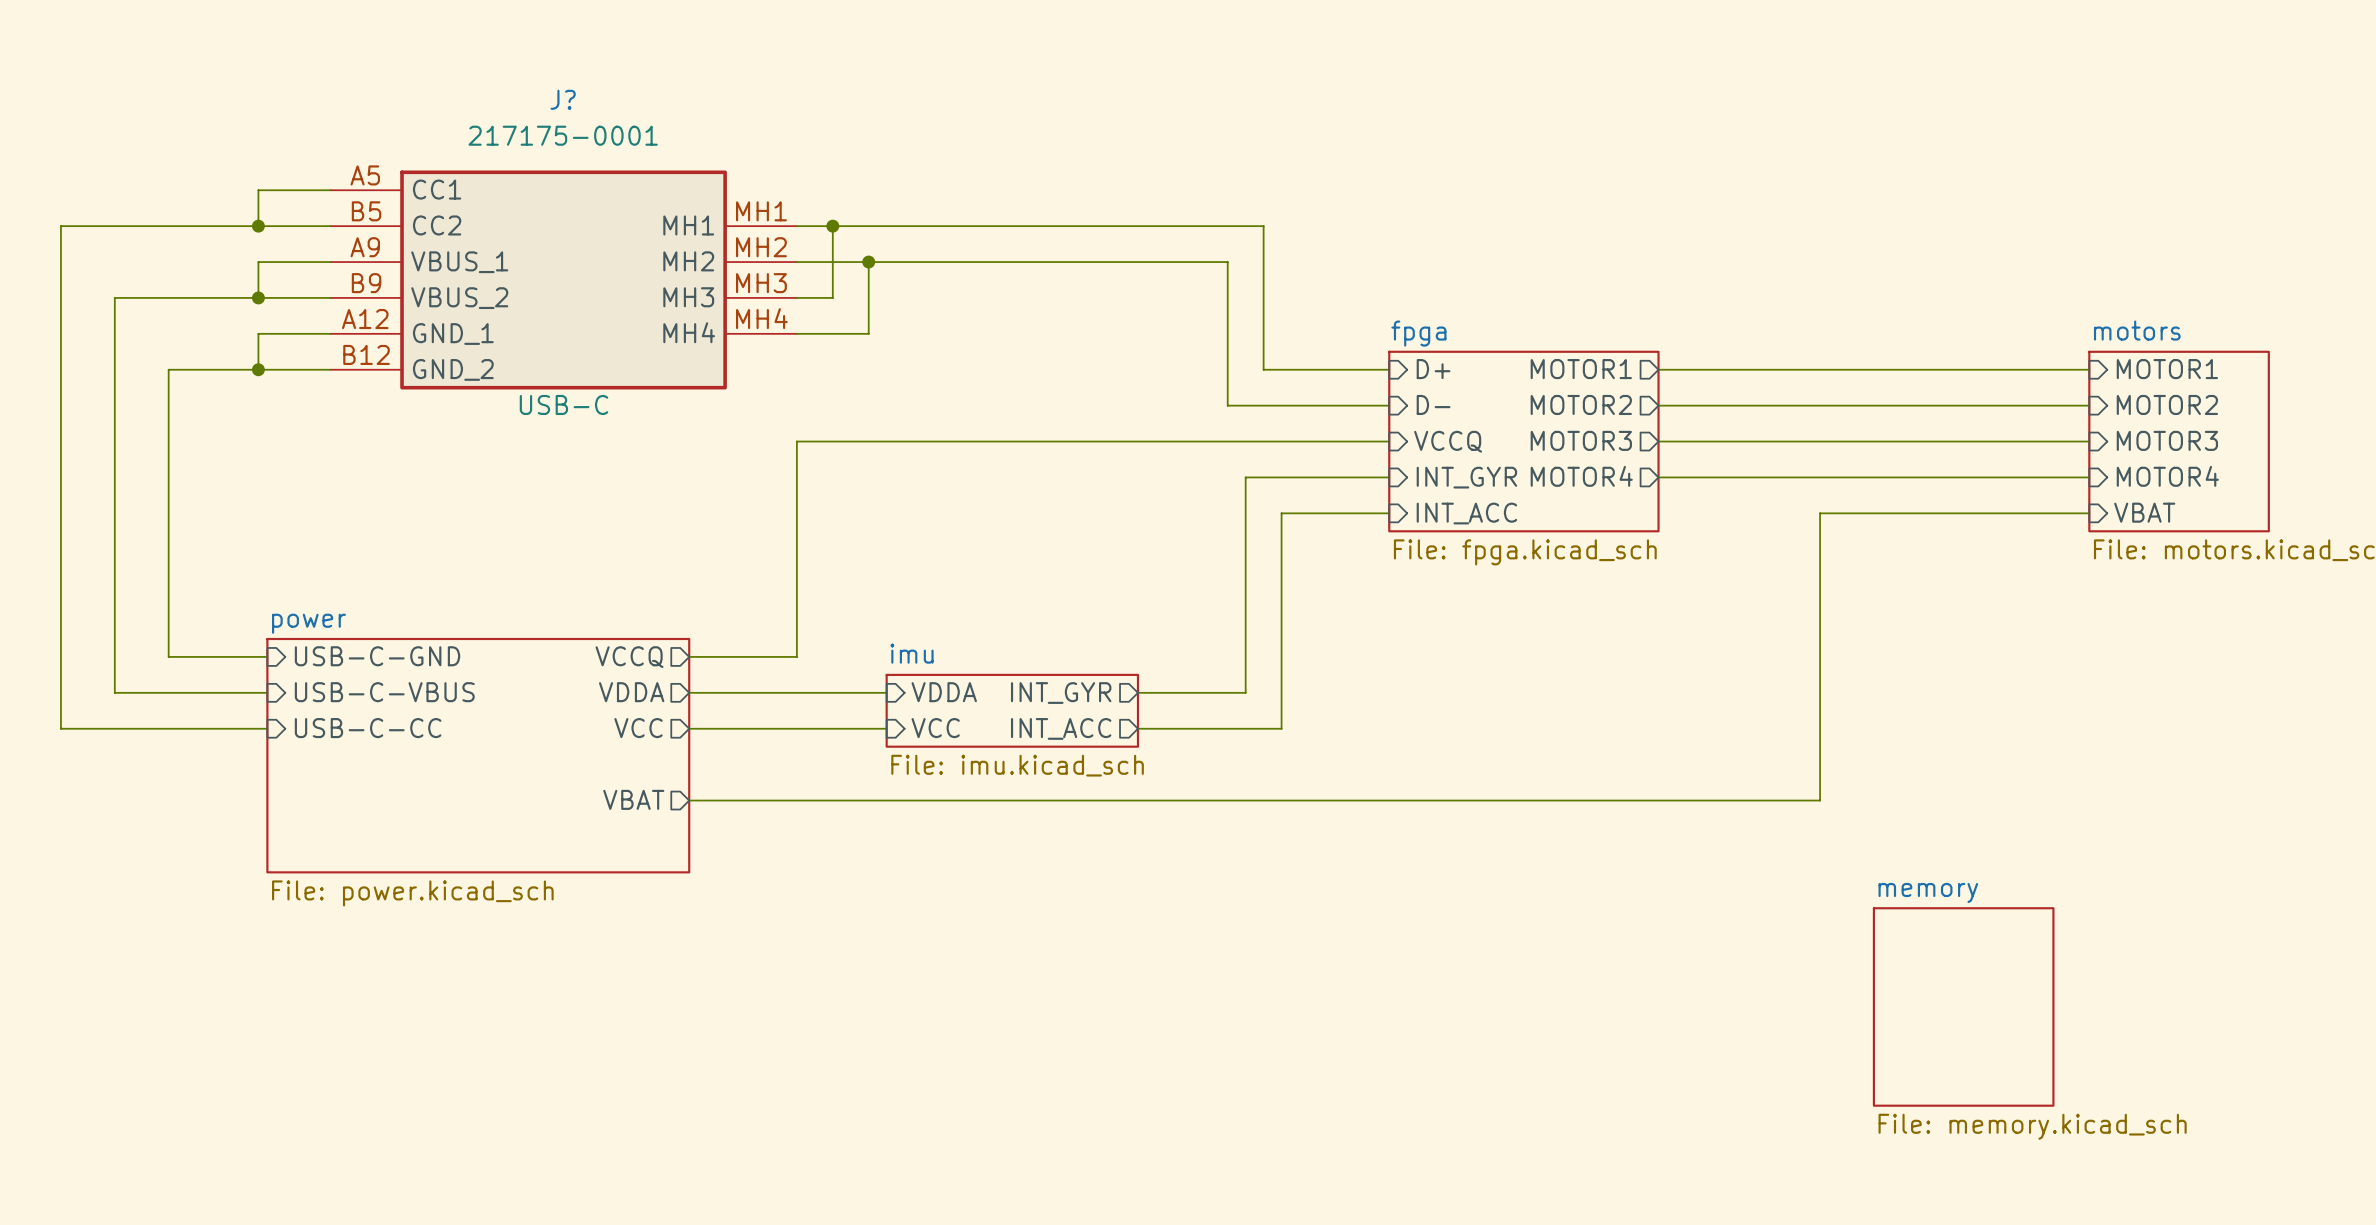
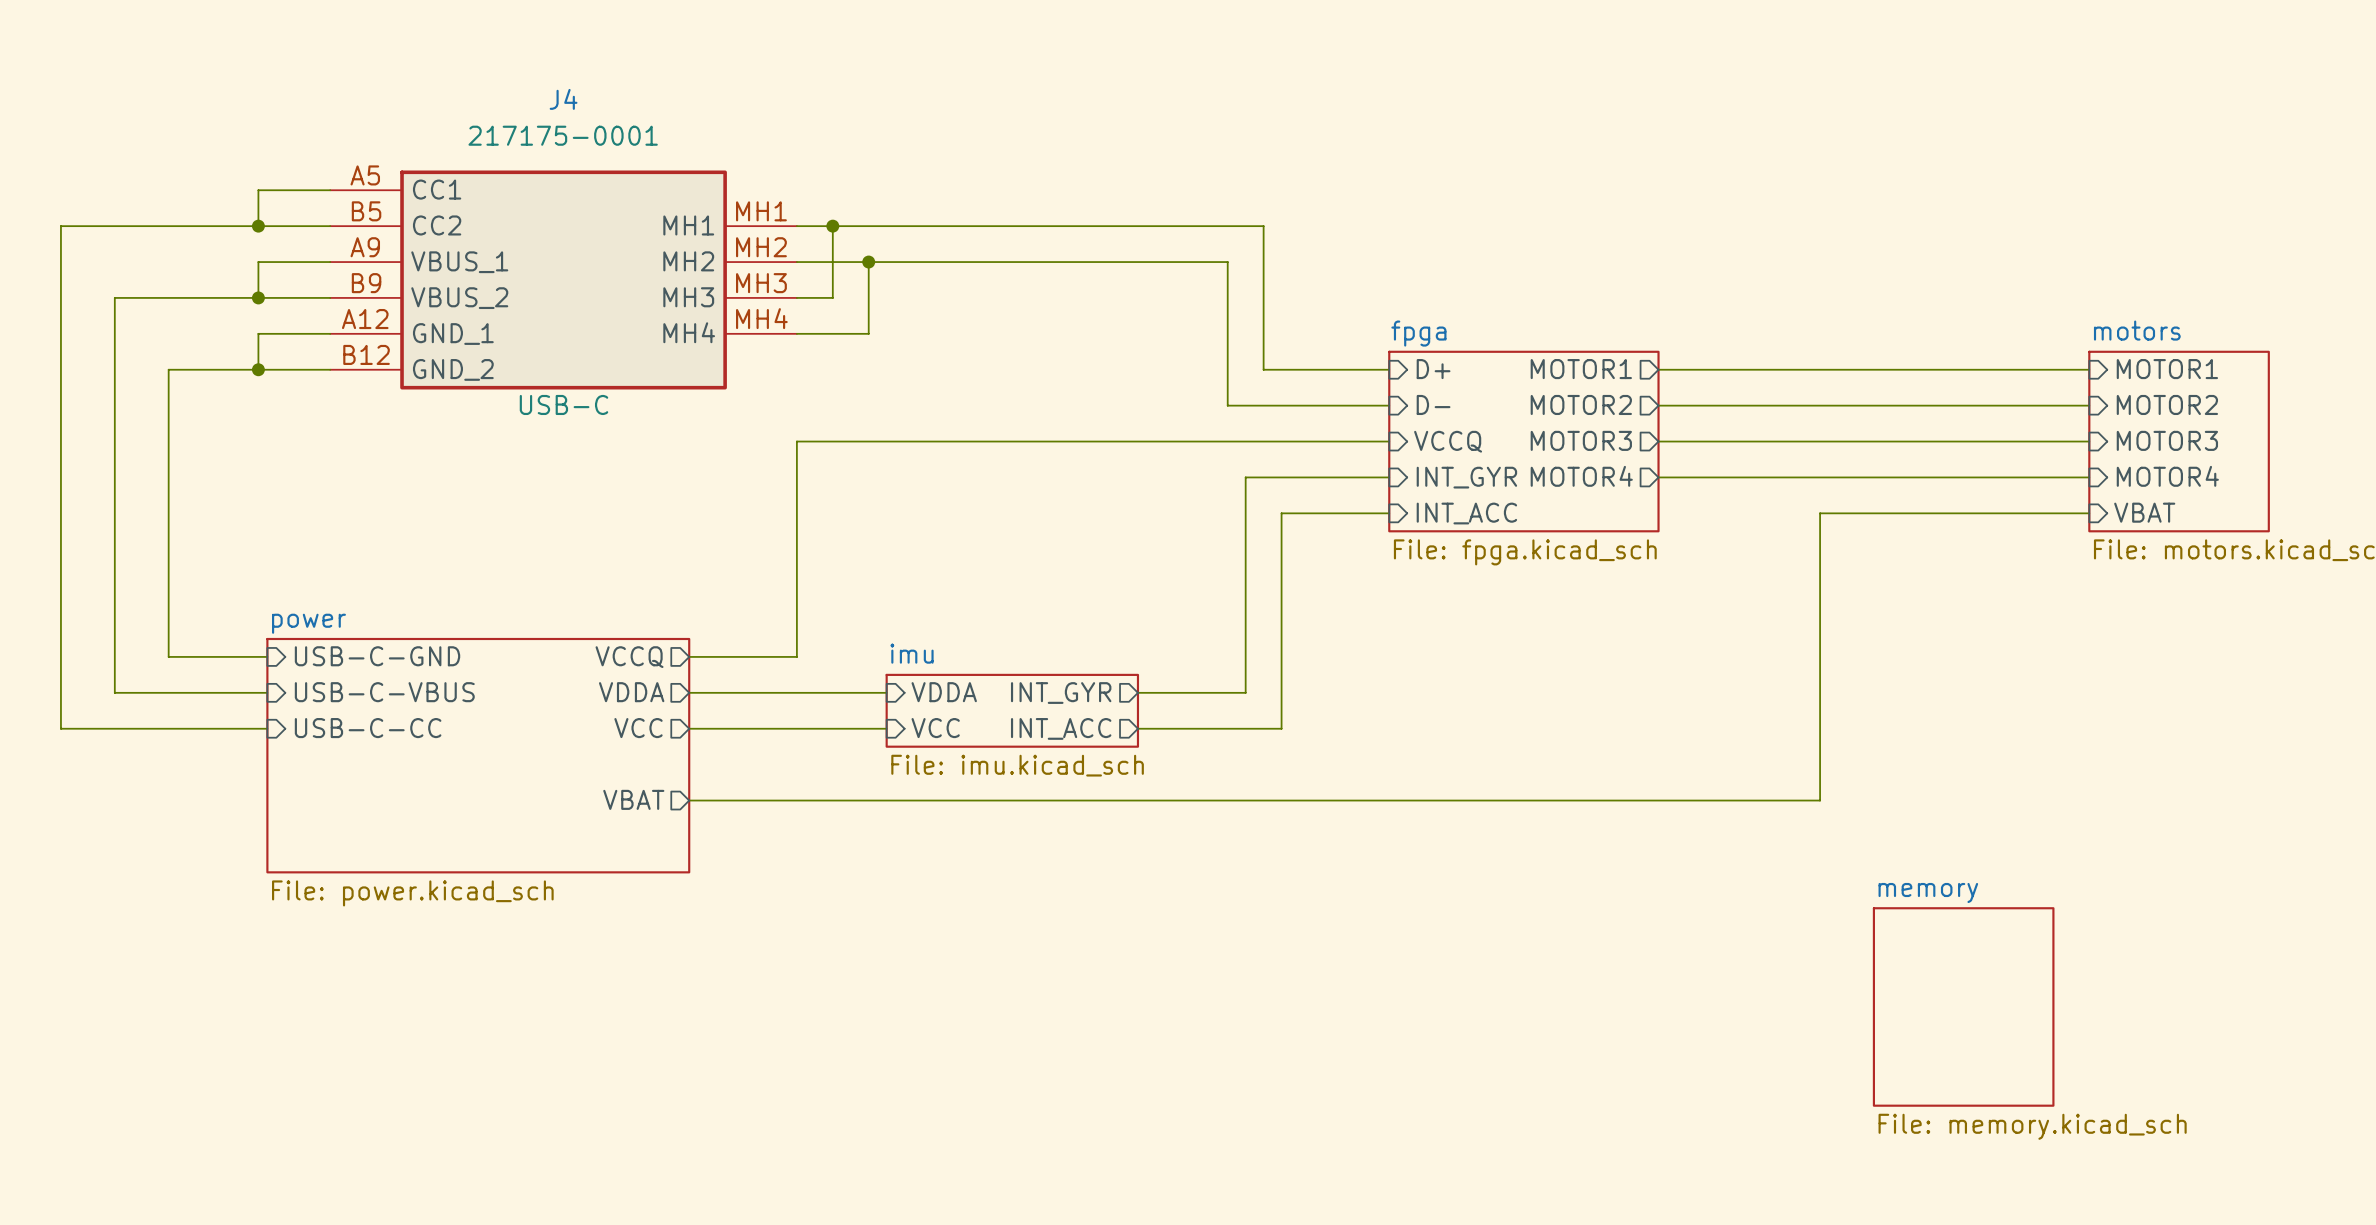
J? name: J? (563, 99) -> J4 (563, 99)

